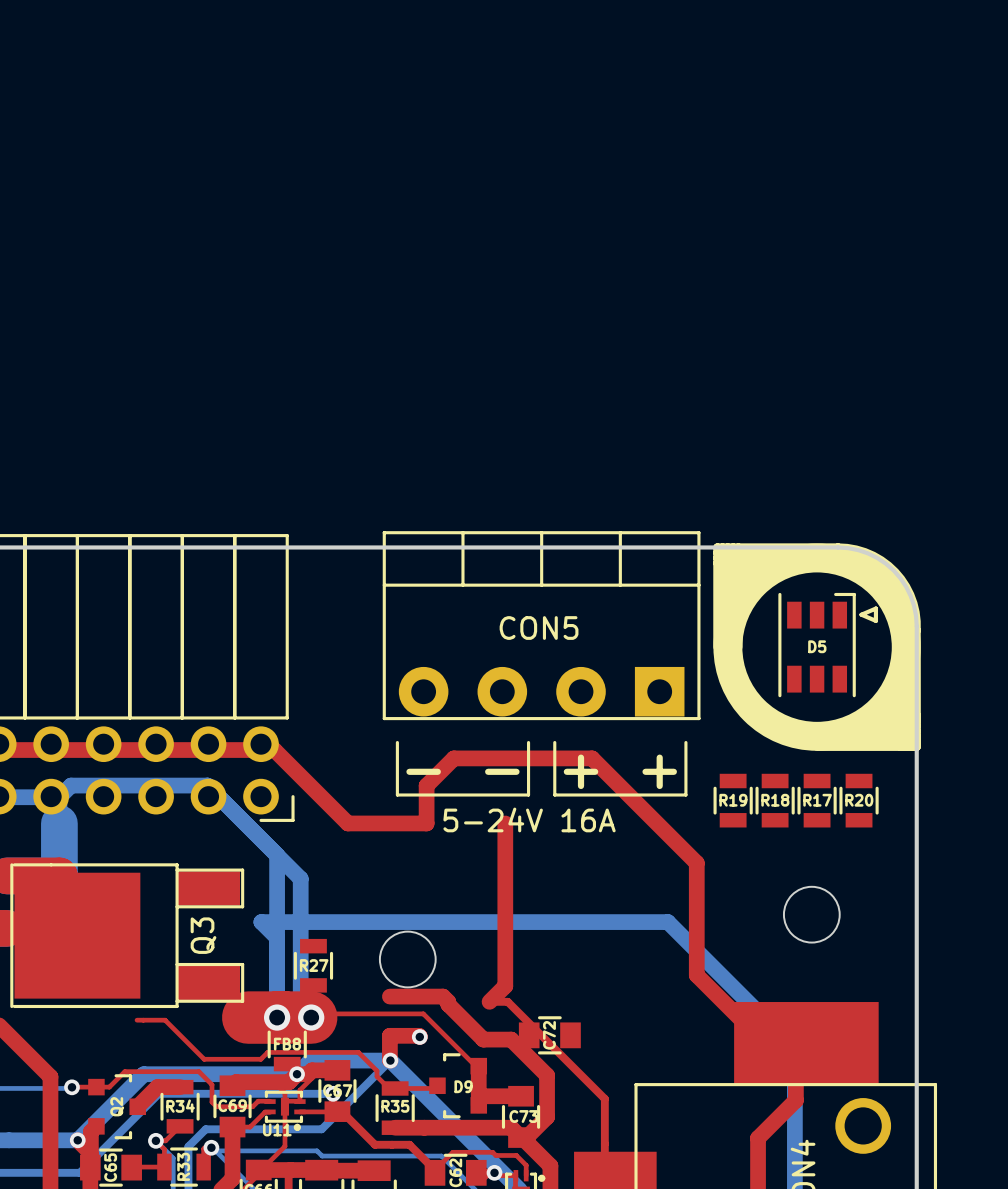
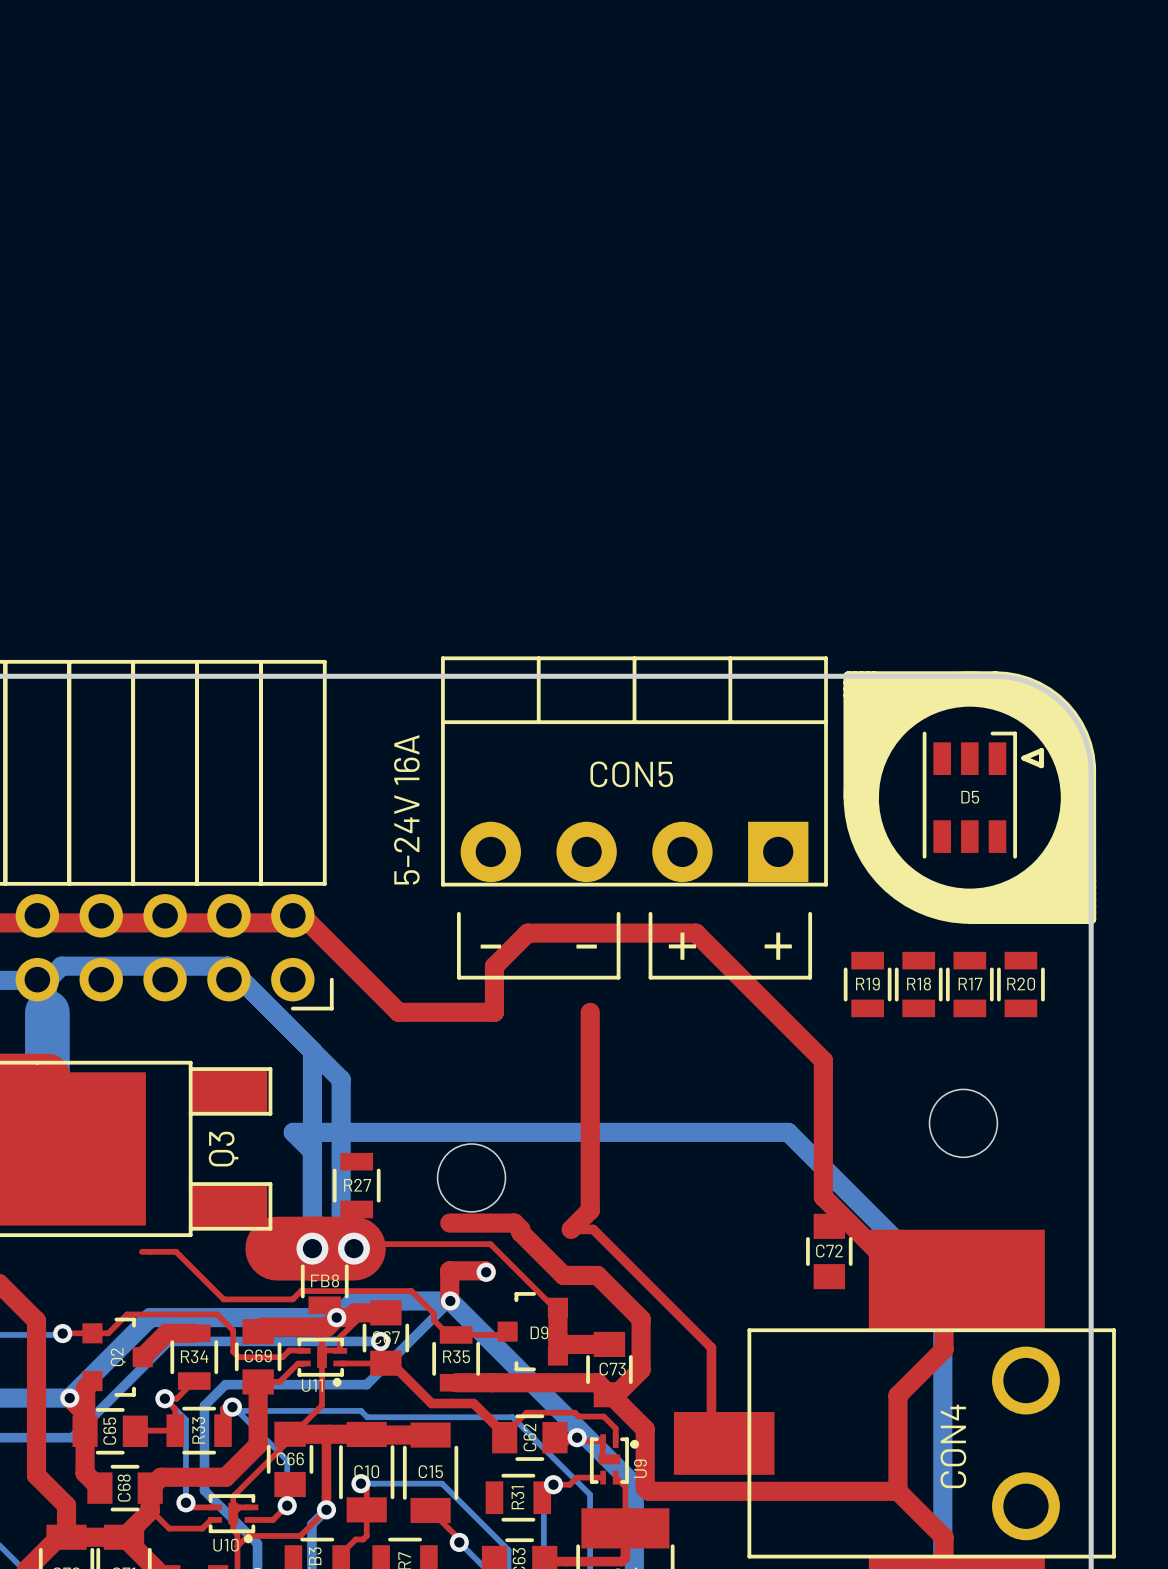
CON5 value rotation: 0° (529, 819) -> 90° counterclockwise (406, 809)
CON5 value position: 5-24V 16A (529, 819) -> 5-24V 16A (406, 809)
C72 rotation: 0° (549, 1035) -> 90° clockwise (829, 1251)
C72 position: (549, 1035) -> (829, 1251)

